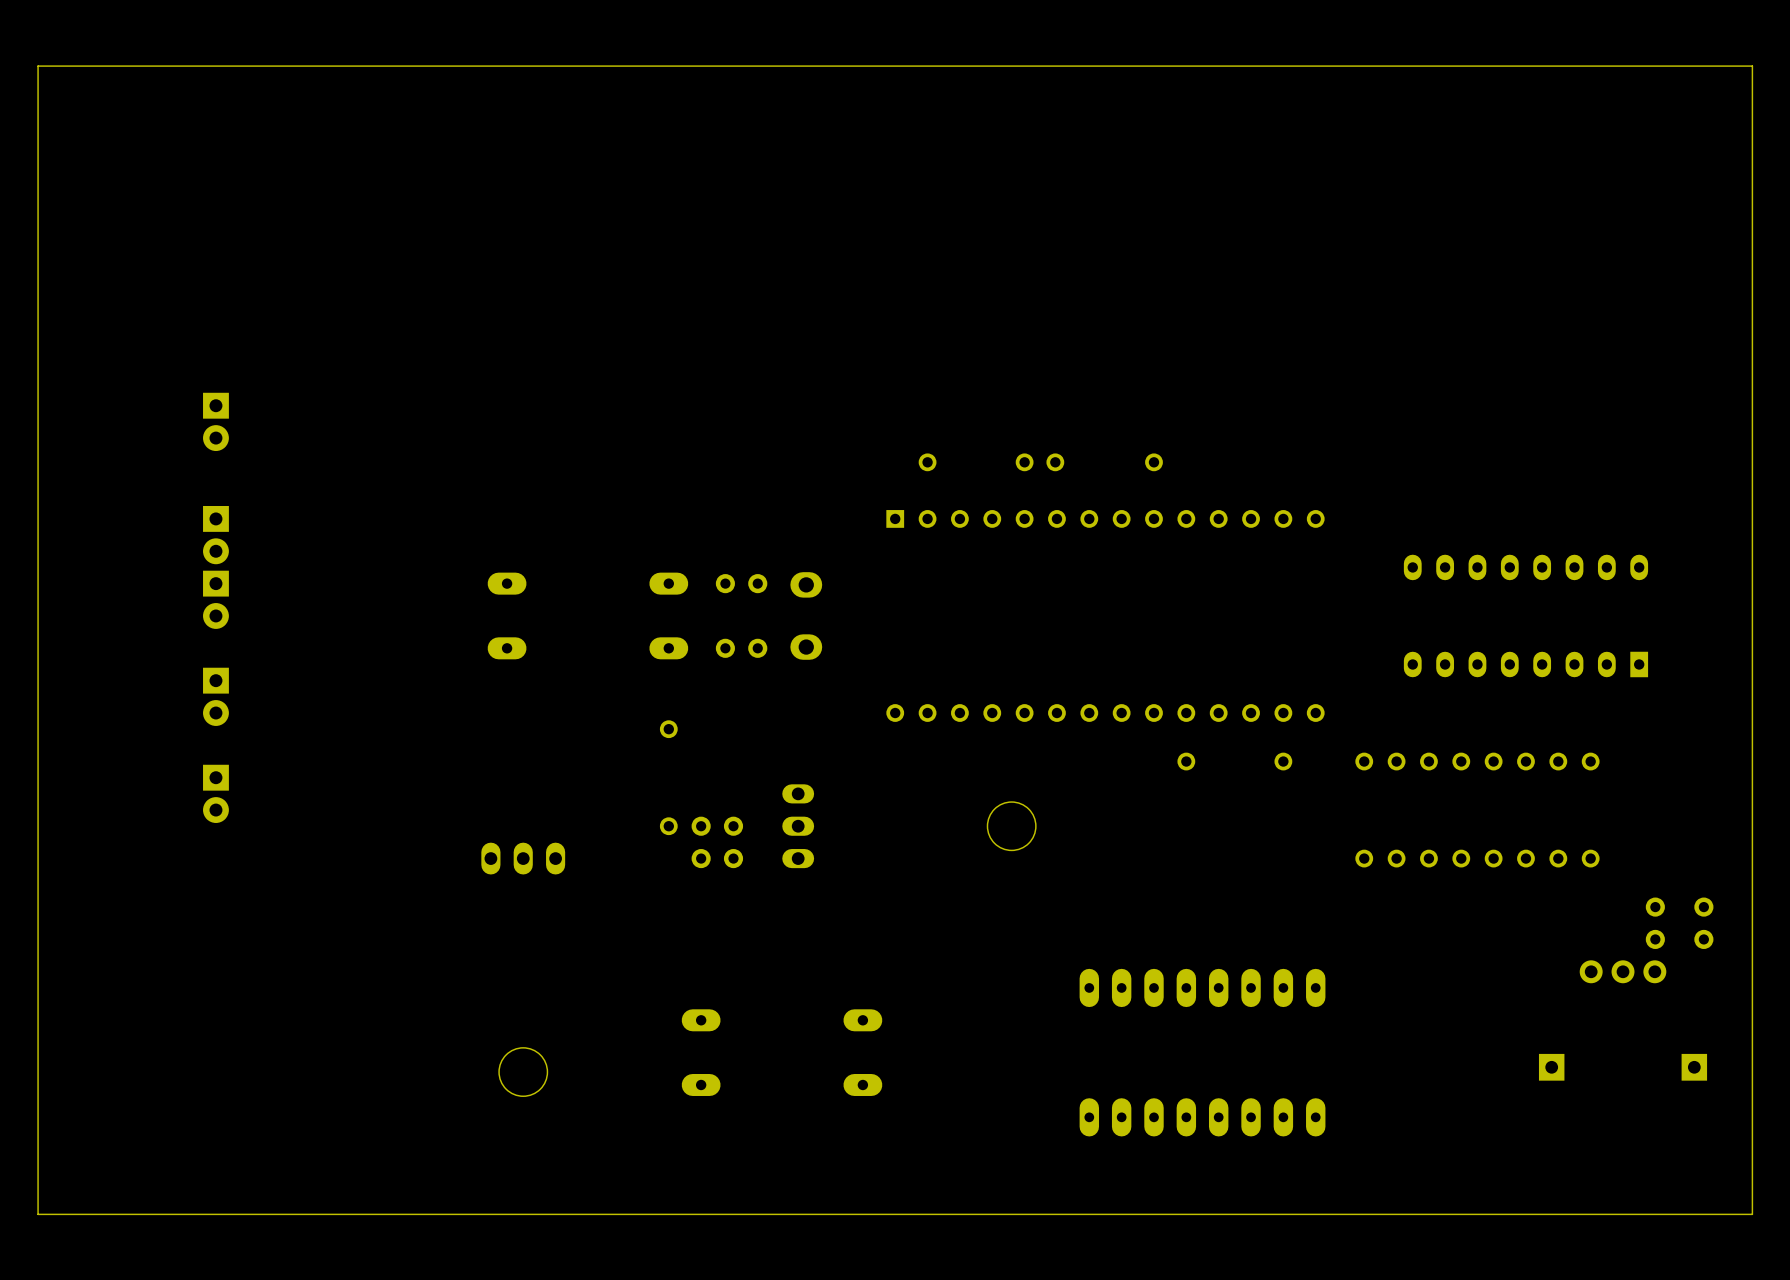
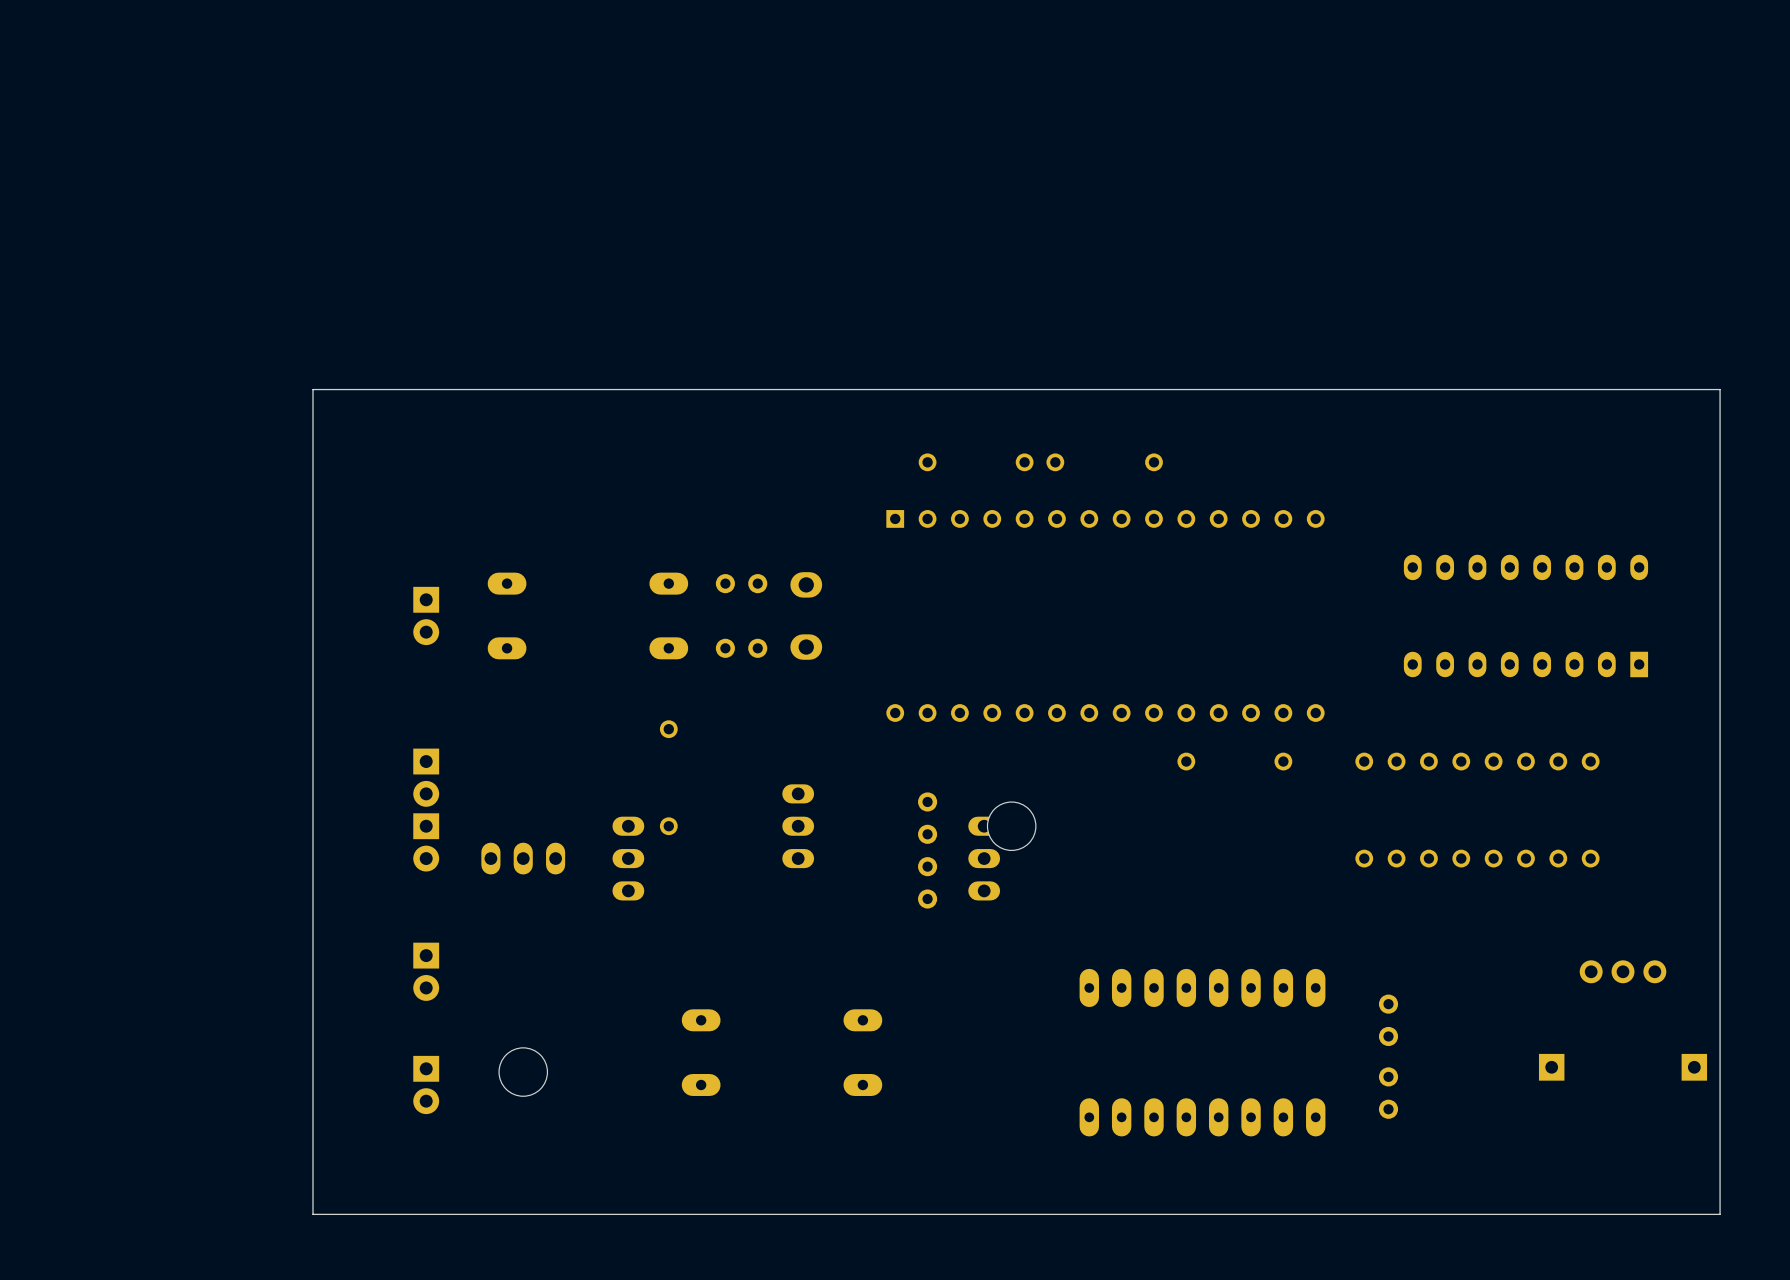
part: (215, 421) -> none
part: (215, 535) -> none
part: (215, 599) -> none
part: none -> (426, 615)
part: (215, 696) -> none
part: none -> (426, 777)
part: (215, 793) -> none
part: none -> (927, 818)
part: (717, 826) -> none
part: none -> (426, 842)
part: none -> (628, 858)
part: (717, 858) -> none
part: none -> (984, 858)
part: none -> (927, 882)
part: (1655, 923) -> none
part: (1703, 923) -> none
part: none -> (426, 971)
part: none -> (1388, 1020)
part: none -> (426, 1084)
part: none -> (1388, 1093)
board edge: (1720, 1214) (1752, 1214) (1752, 66) (38, 66) (38, 1214) (313, 1214) -> (1720, 1214) (1720, 389) (313, 389) (313, 1214)

